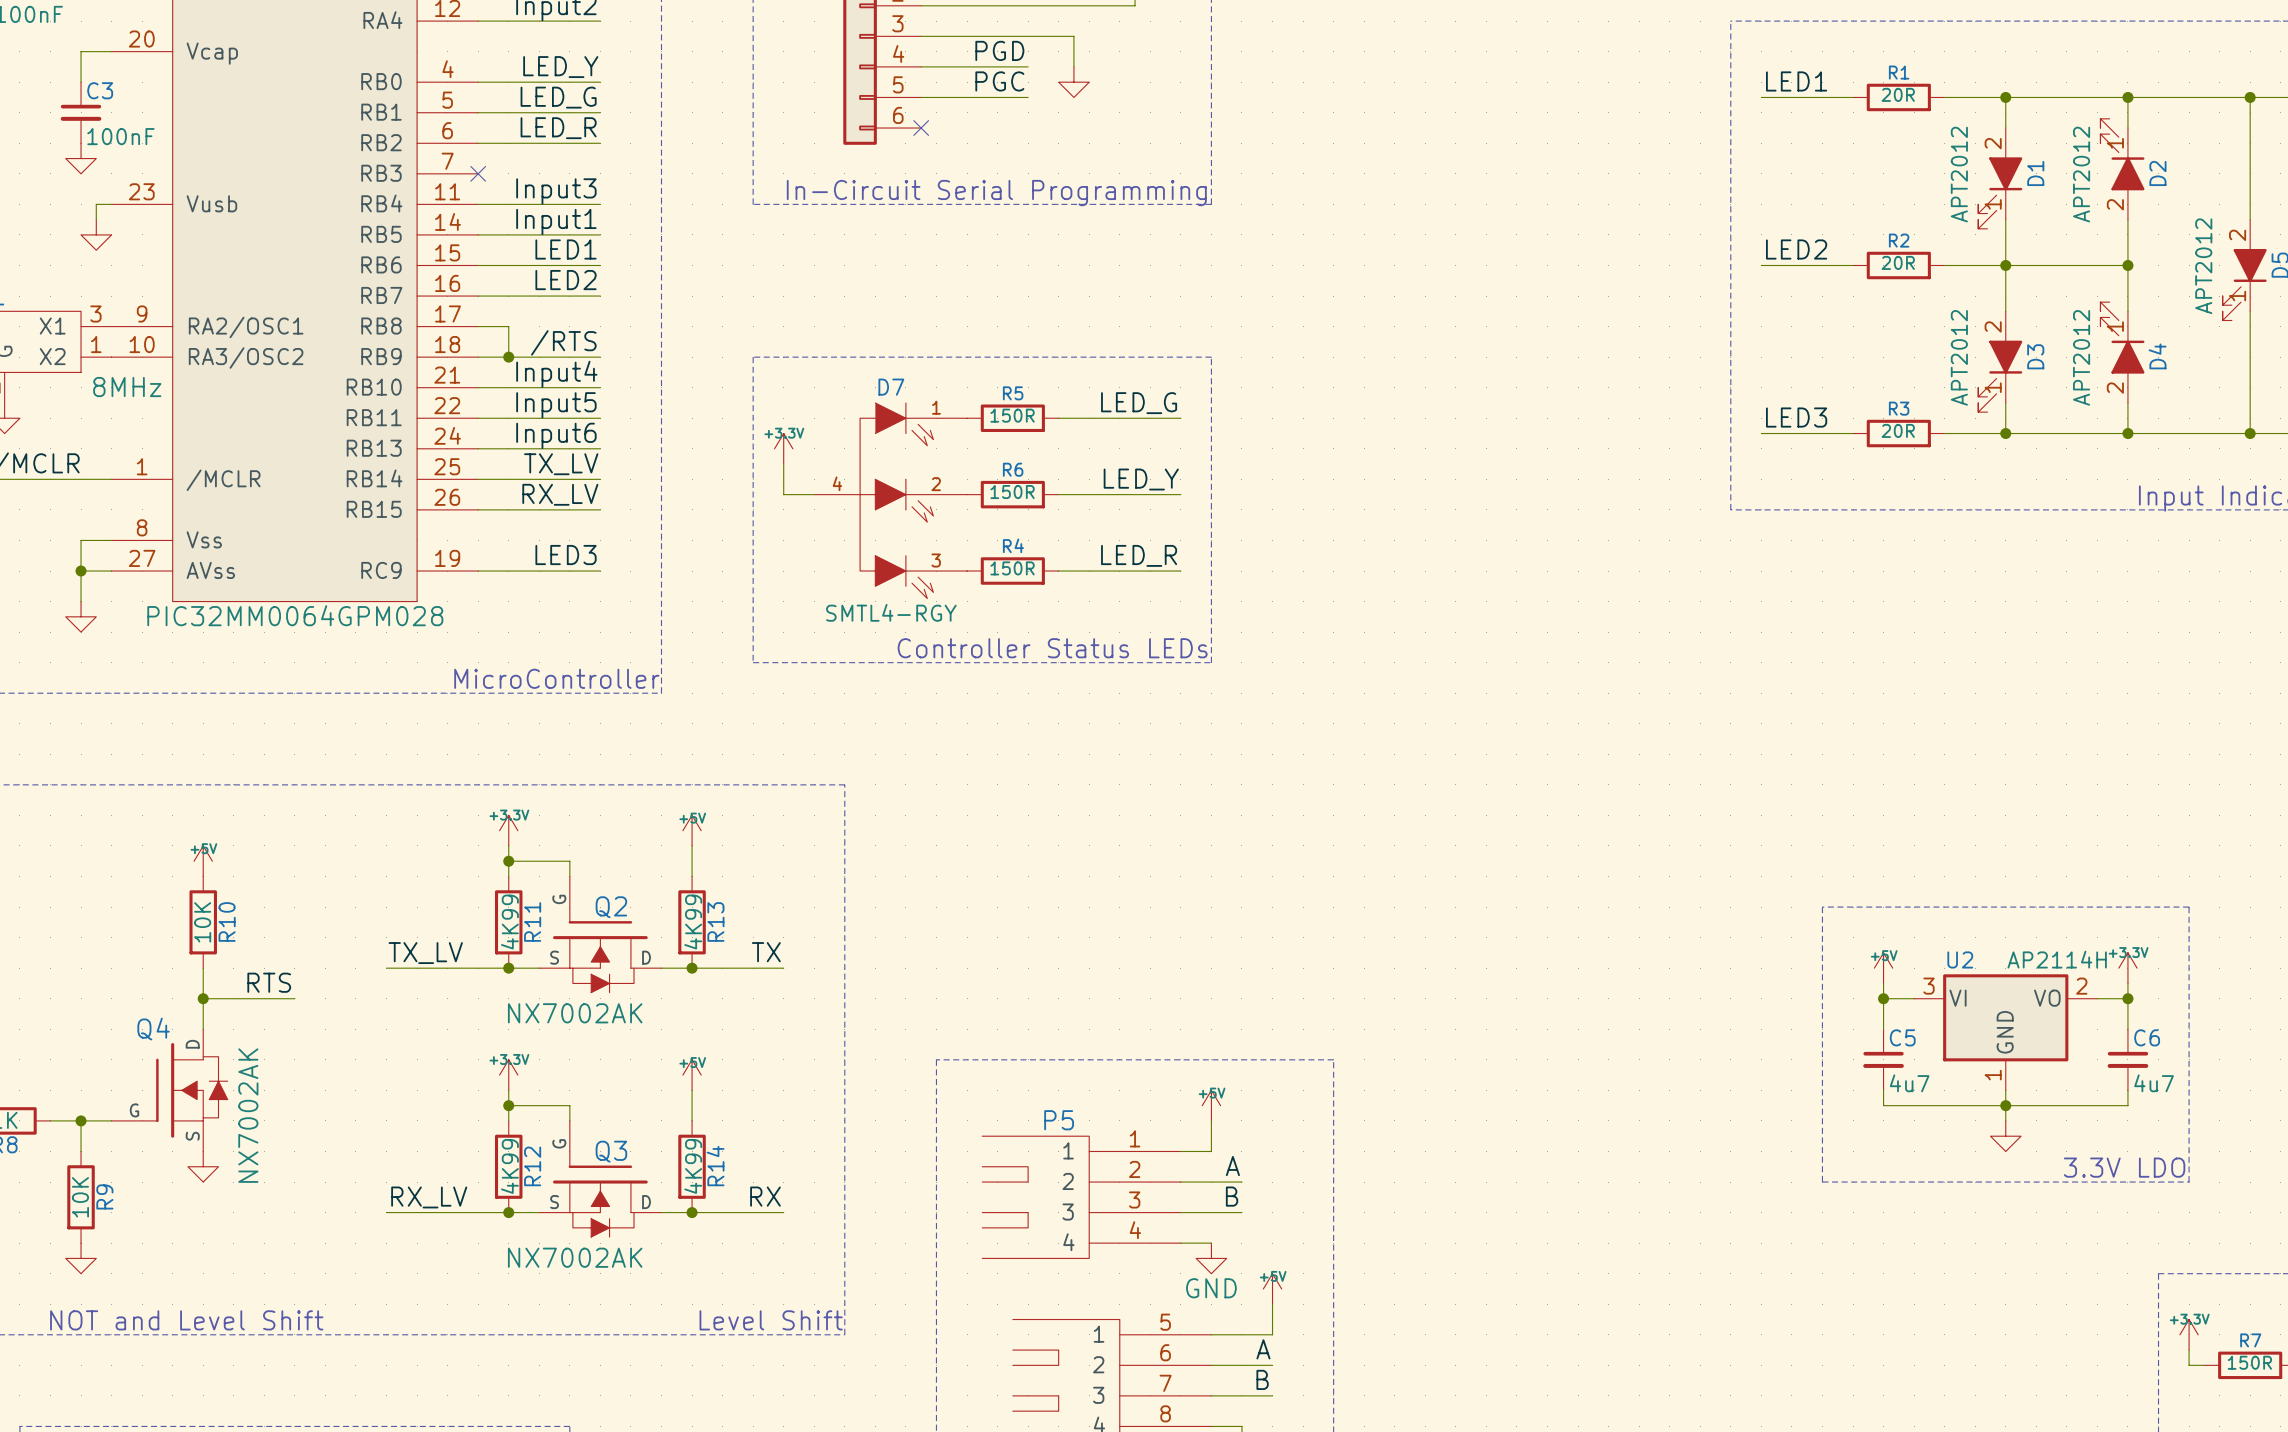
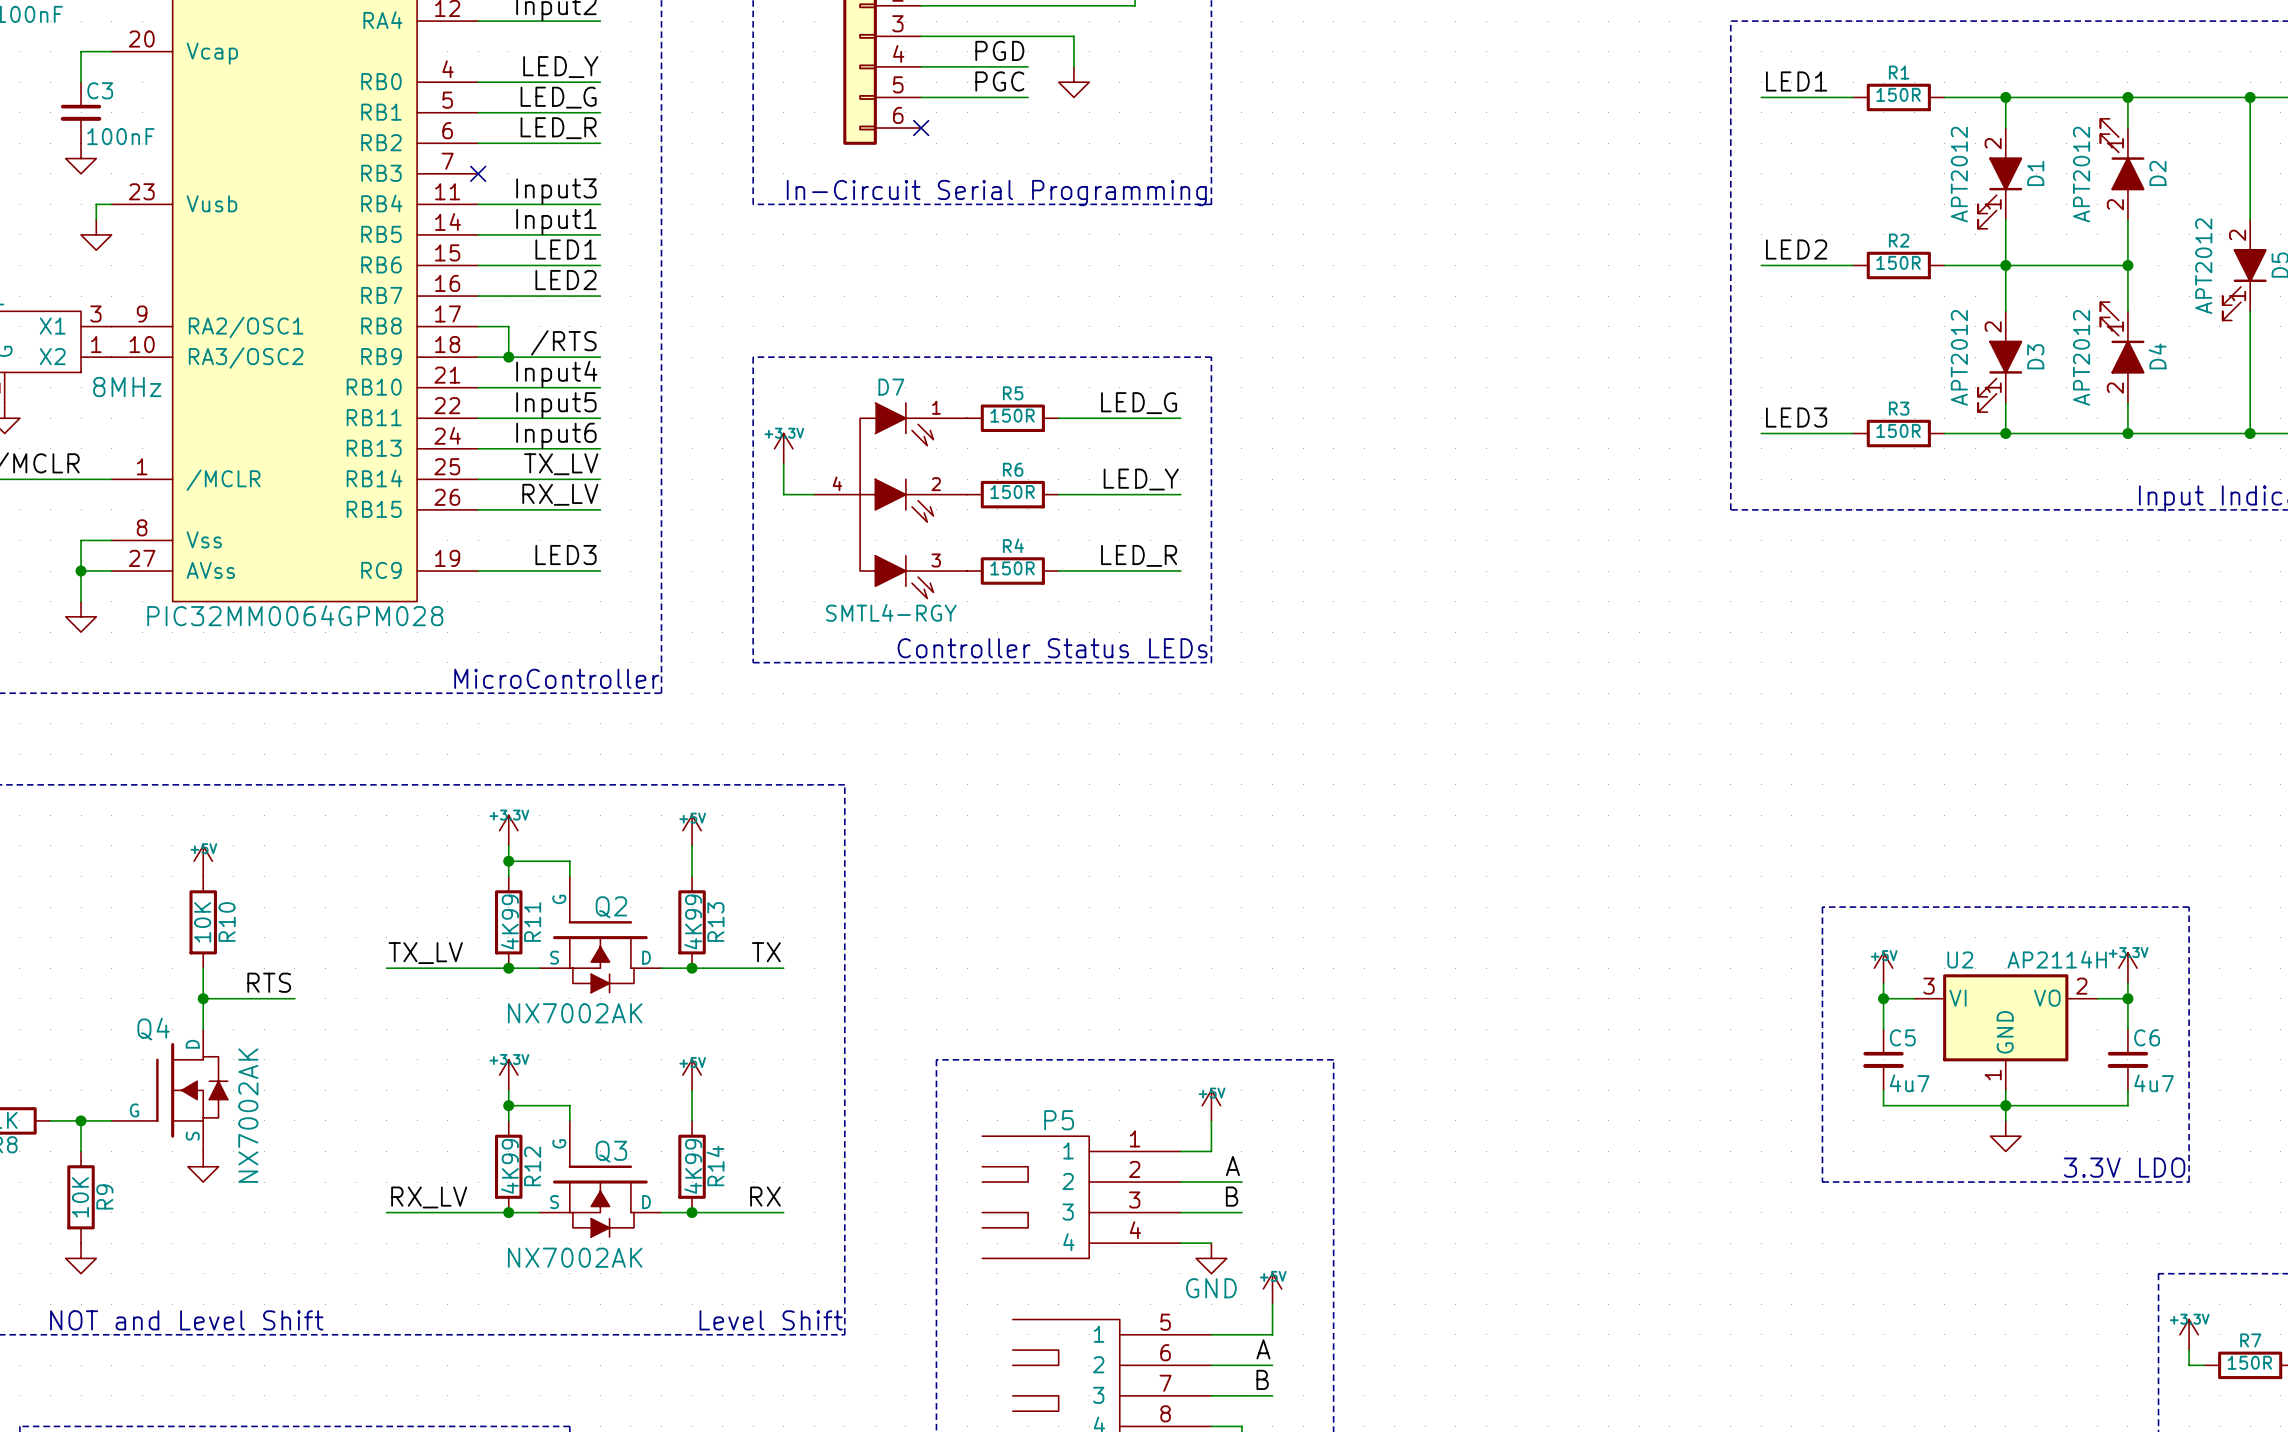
R1 value: 20R (1898, 94) -> 150R (1898, 94)
R2 value: 20R (1898, 262) -> 150R (1898, 262)
R3 value: 20R (1898, 430) -> 150R (1898, 430)

